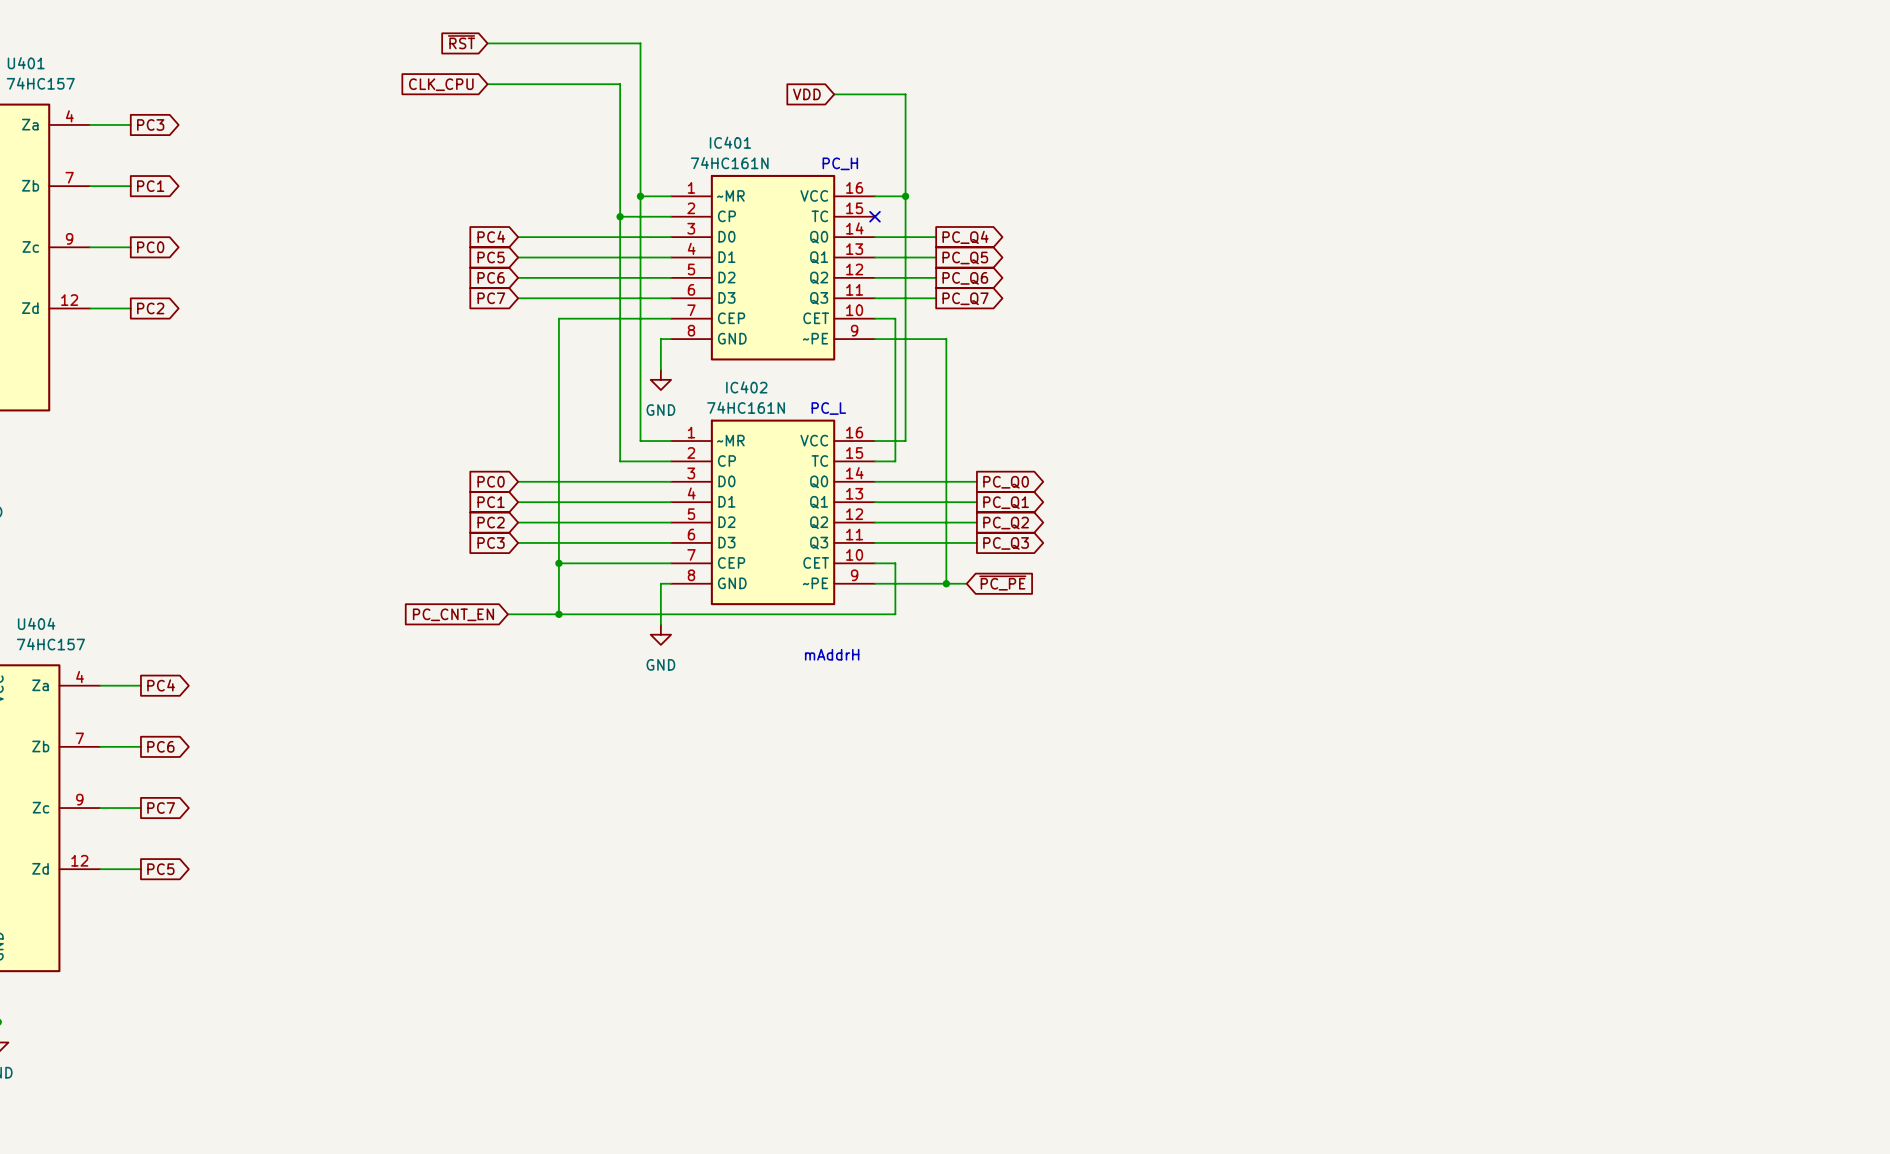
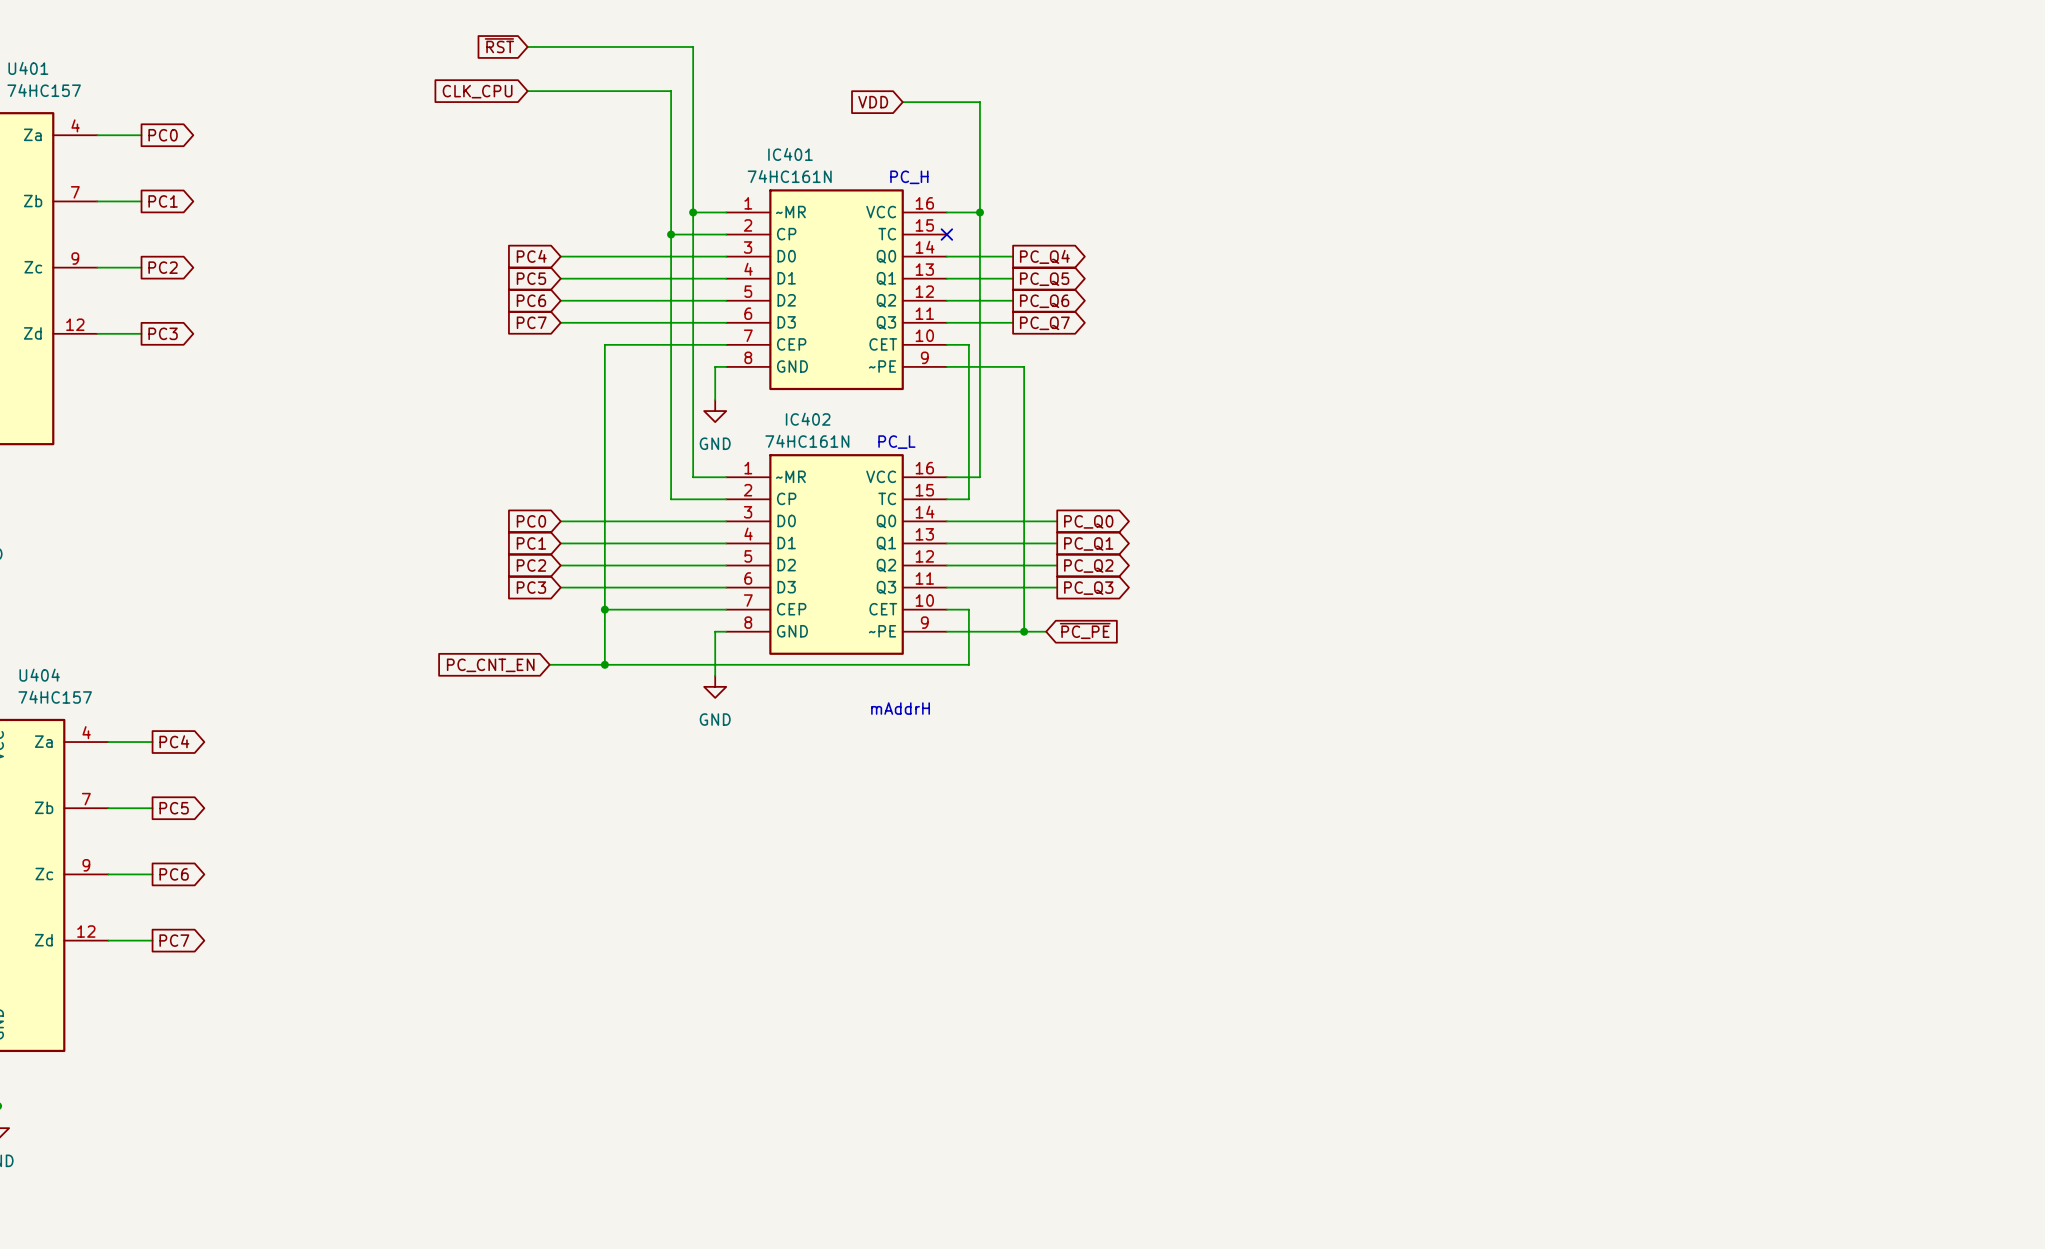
global label: PC3 (150, 124) -> PC0 (163, 135)
global label: PC0 (150, 247) -> PC2 (163, 267)
global label: PC2 (150, 308) -> PC3 (163, 333)
global label: PC6 (160, 746) -> PC5 (174, 808)
global label: PC7 (161, 808) -> PC6 (174, 874)
global label: PC5 (160, 869) -> PC7 (174, 940)

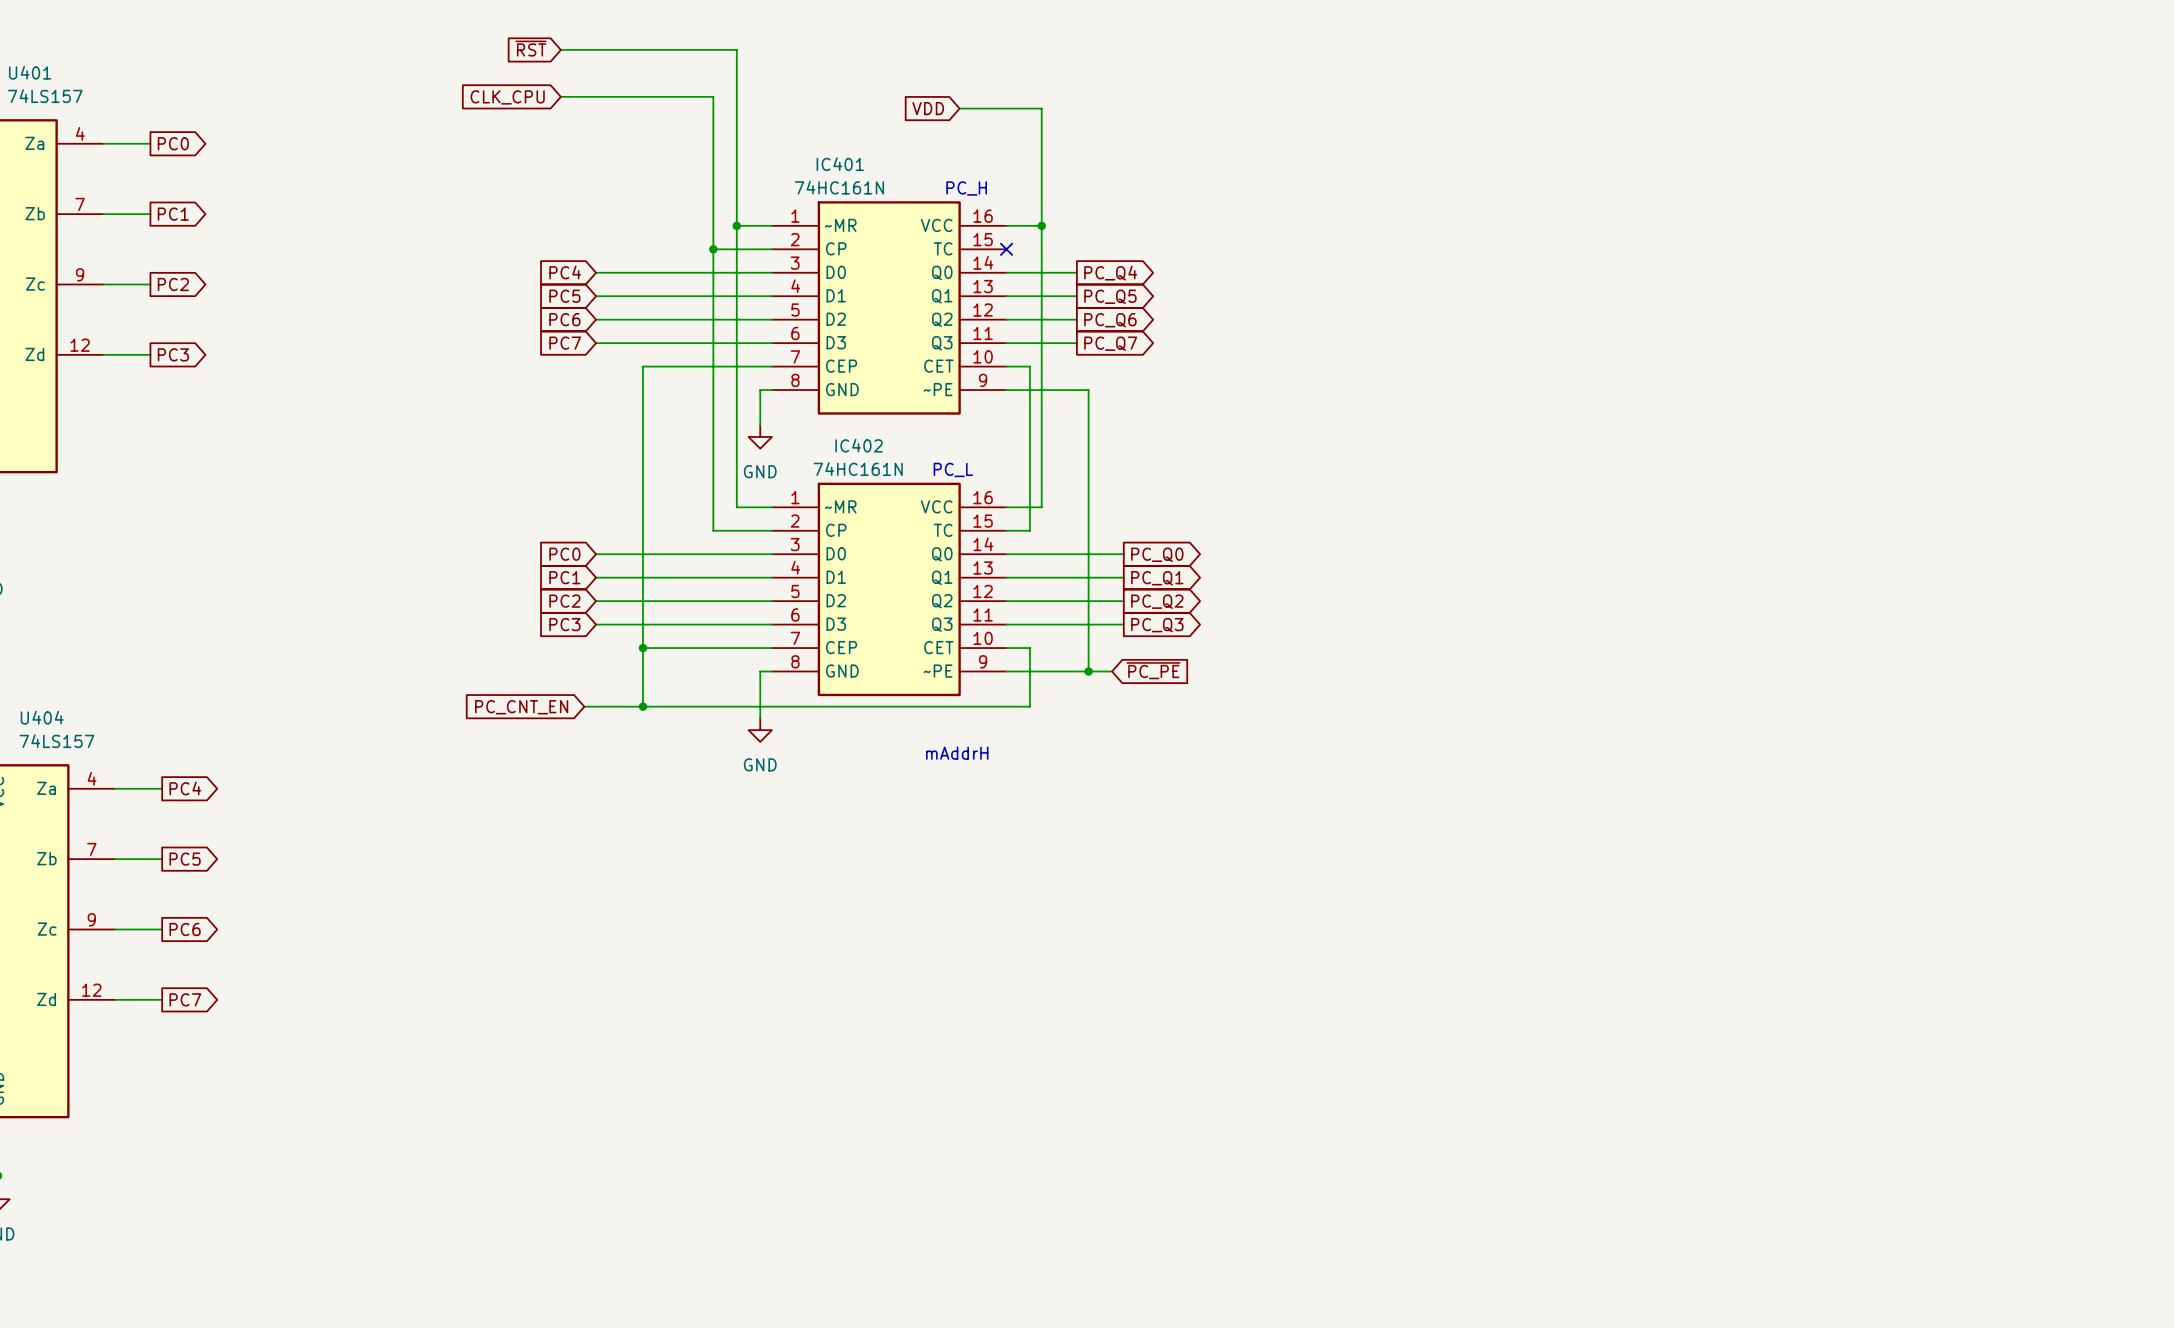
U401 value: 74HC157 (44, 90) -> 74LS157 (45, 96)
U404 value: 74HC157 (55, 697) -> 74LS157 (56, 741)

